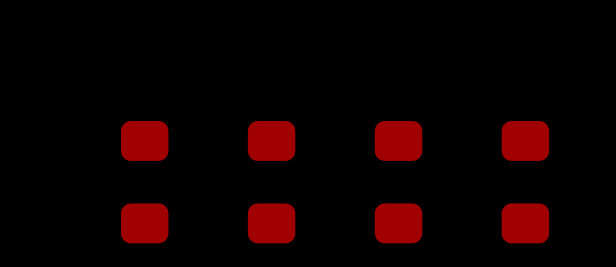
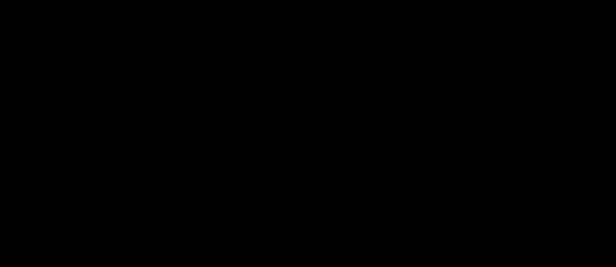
part: (144, 182) -> none
part: (271, 182) -> none
part: (398, 182) -> none
part: (525, 182) -> none

